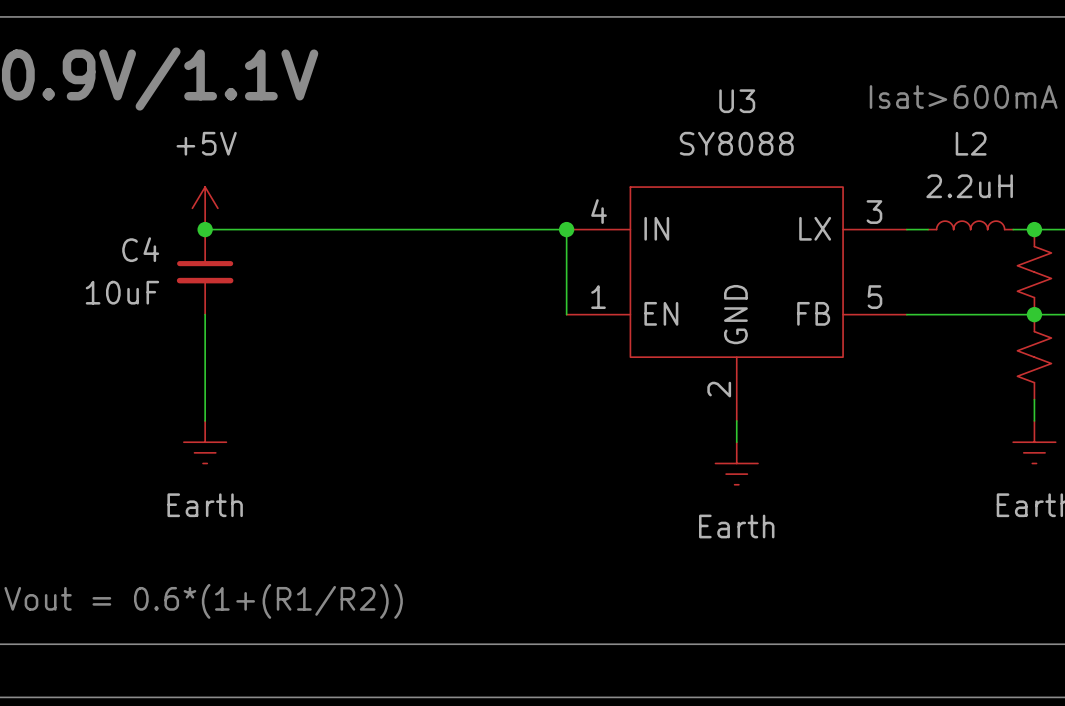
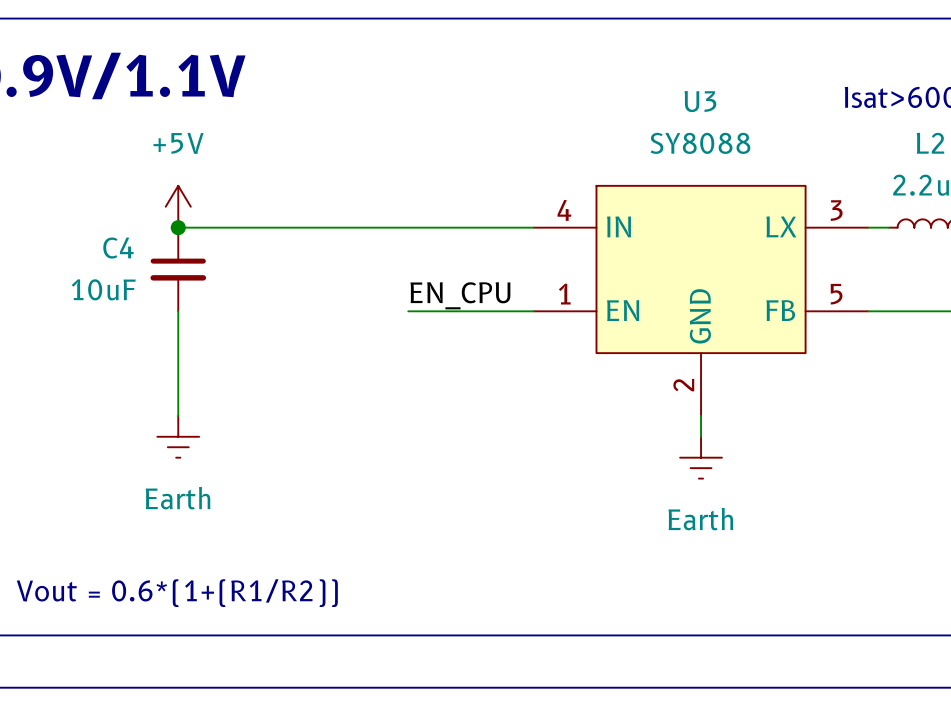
wire: (566, 229) (566, 314) -> (408, 311) (533, 311)
junction: (566, 229) -> none
label: none -> EN_CPU (460, 295)

